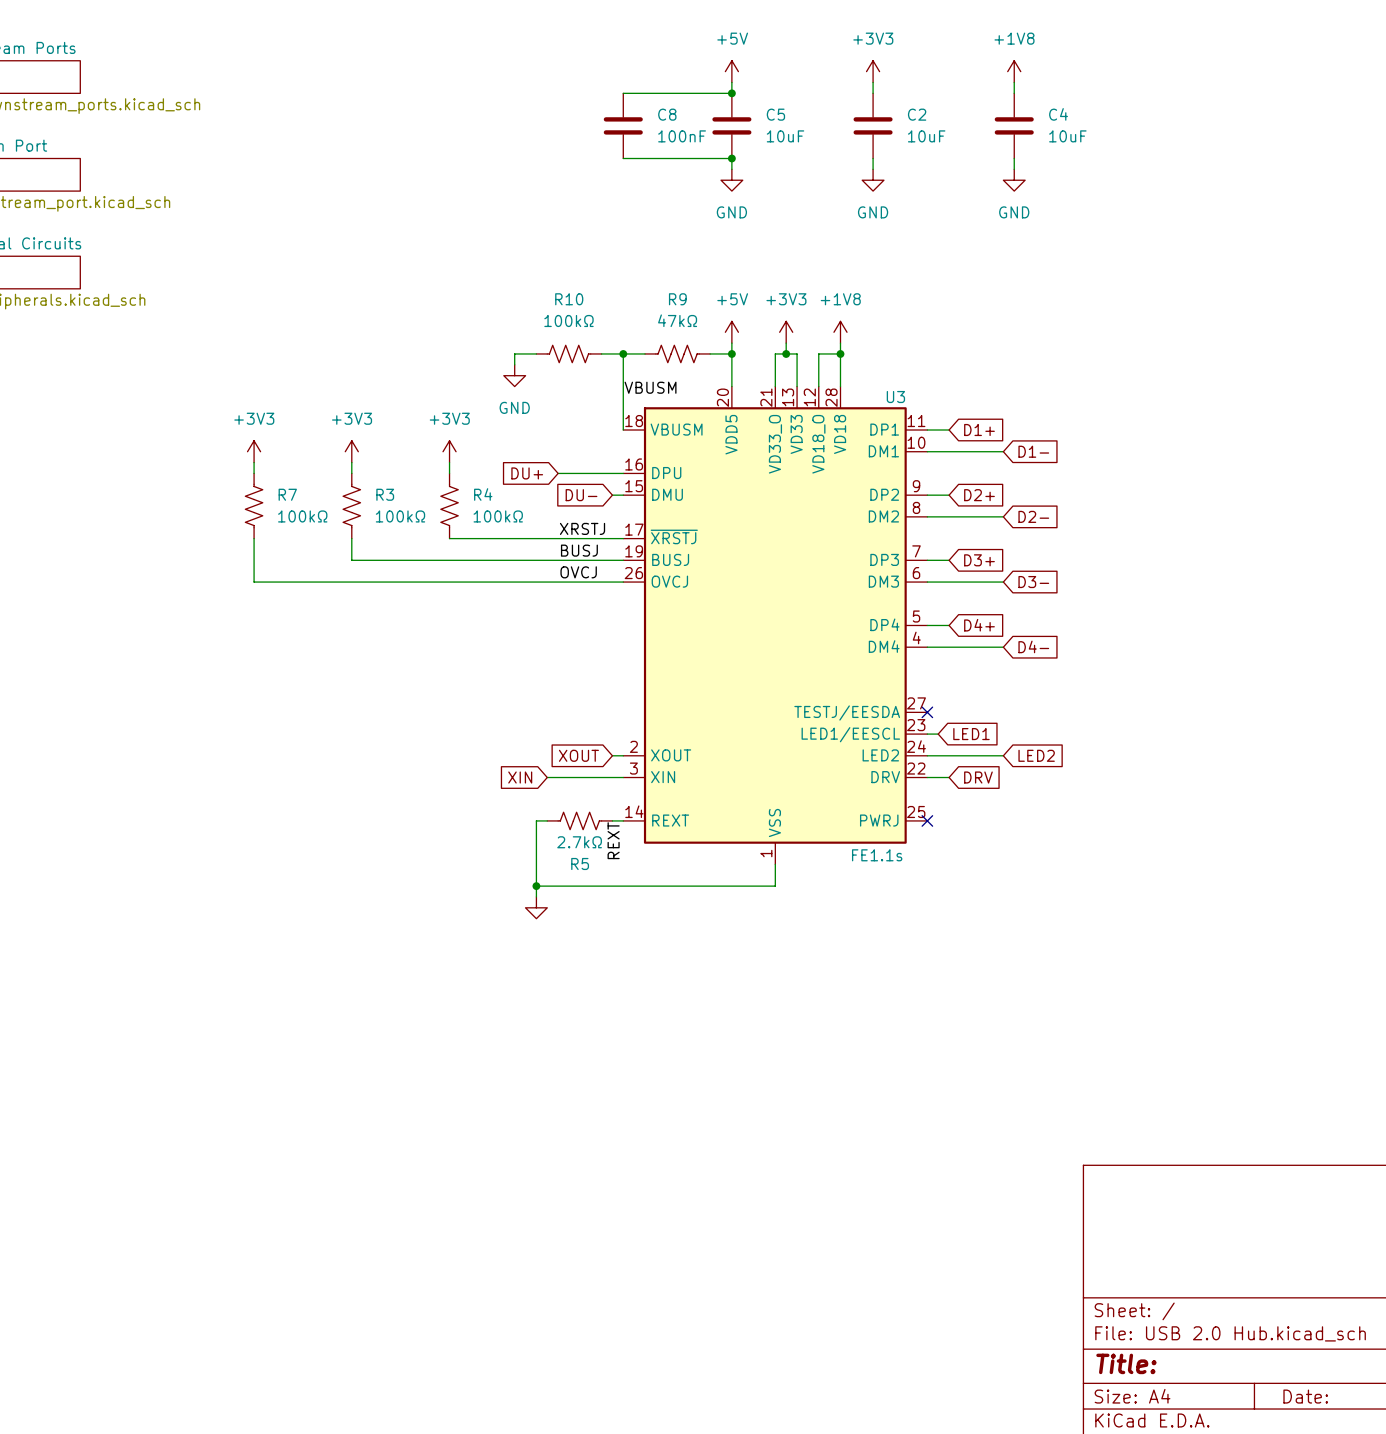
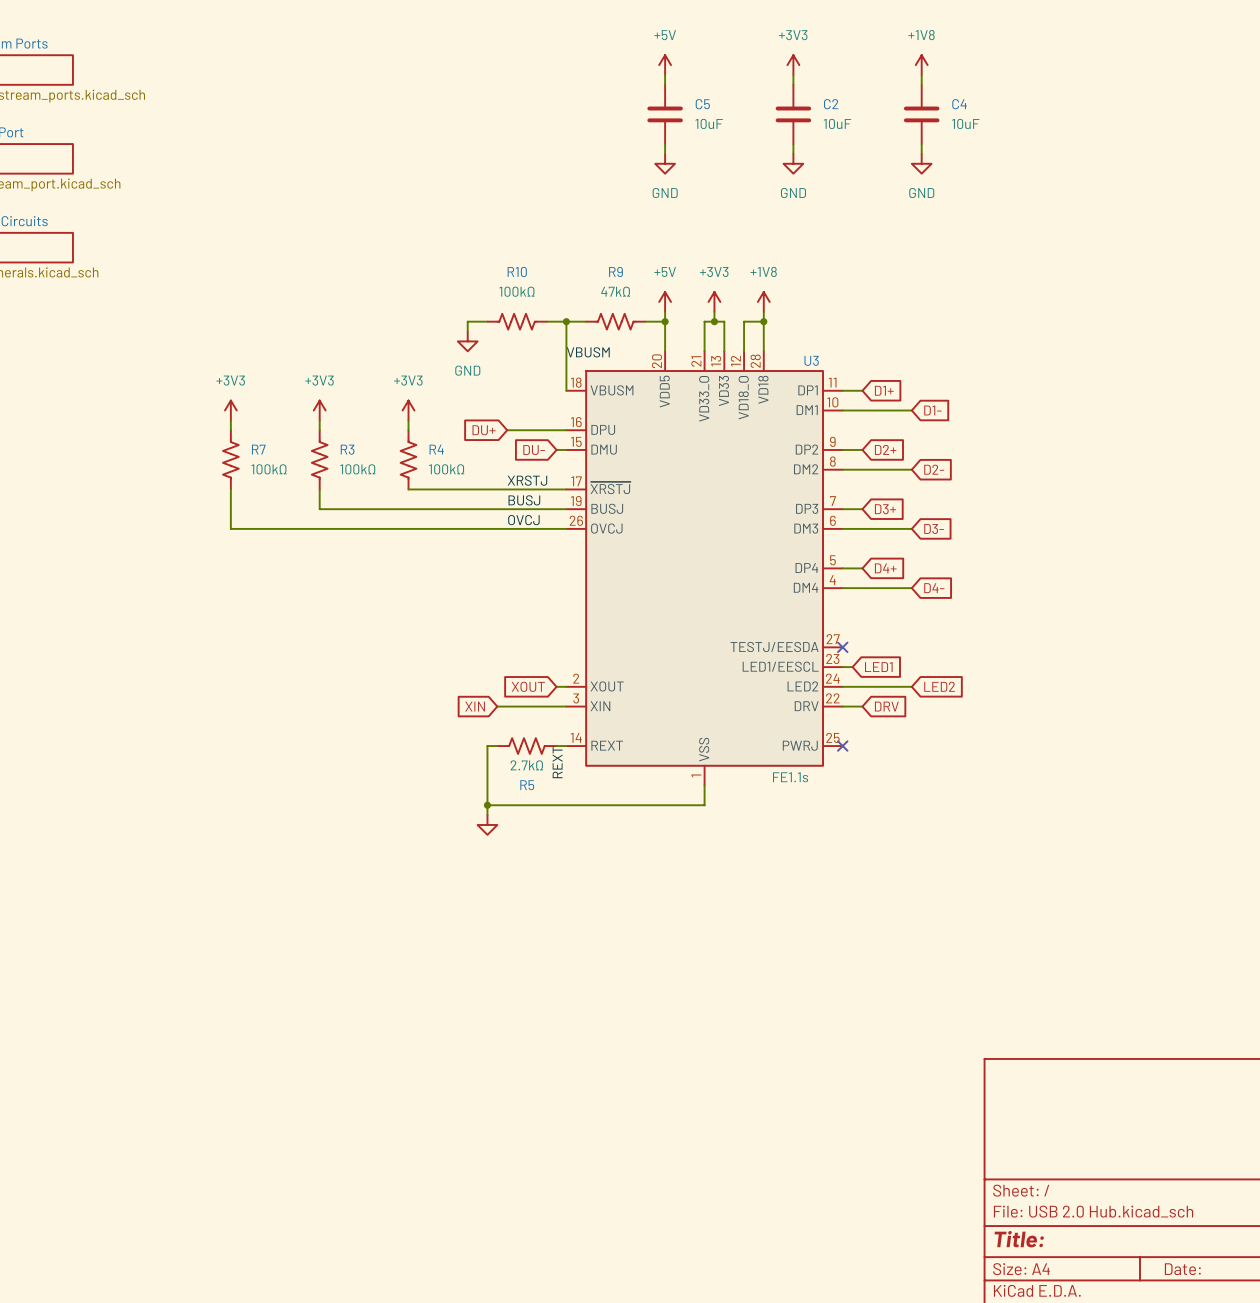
wire: (623, 93) (731, 93) -> none
junction: (731, 93) -> none
C8: 100nF (623, 125) -> none
wire: (623, 158) (731, 158) -> none
junction: (731, 158) -> none

